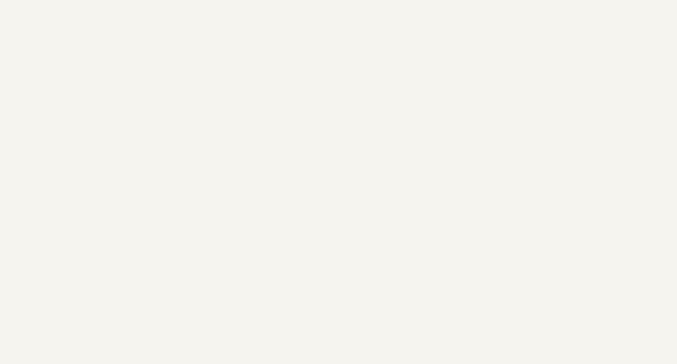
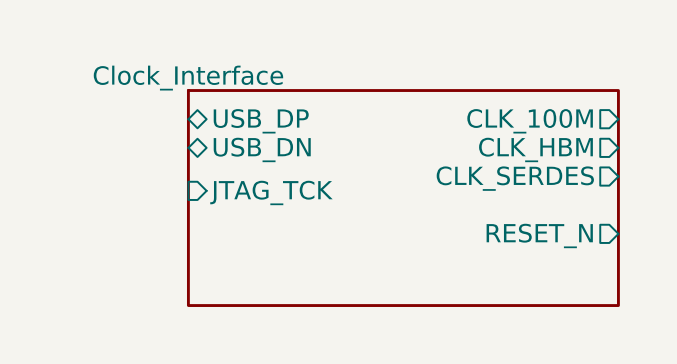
sheet pin: none -> USB_DP (261, 121)
sheet pin: none -> CLK_100M (530, 121)
sheet pin: none -> USB_DN (262, 149)
sheet pin: none -> CLK_HBM (535, 149)
sheet pin: none -> CLK_SERDES (515, 178)
sheet pin: none -> JTAG_TCK (271, 192)
sheet Clock_Interface: none -> (403, 198)
sheet pin: none -> RESET_N (539, 235)

